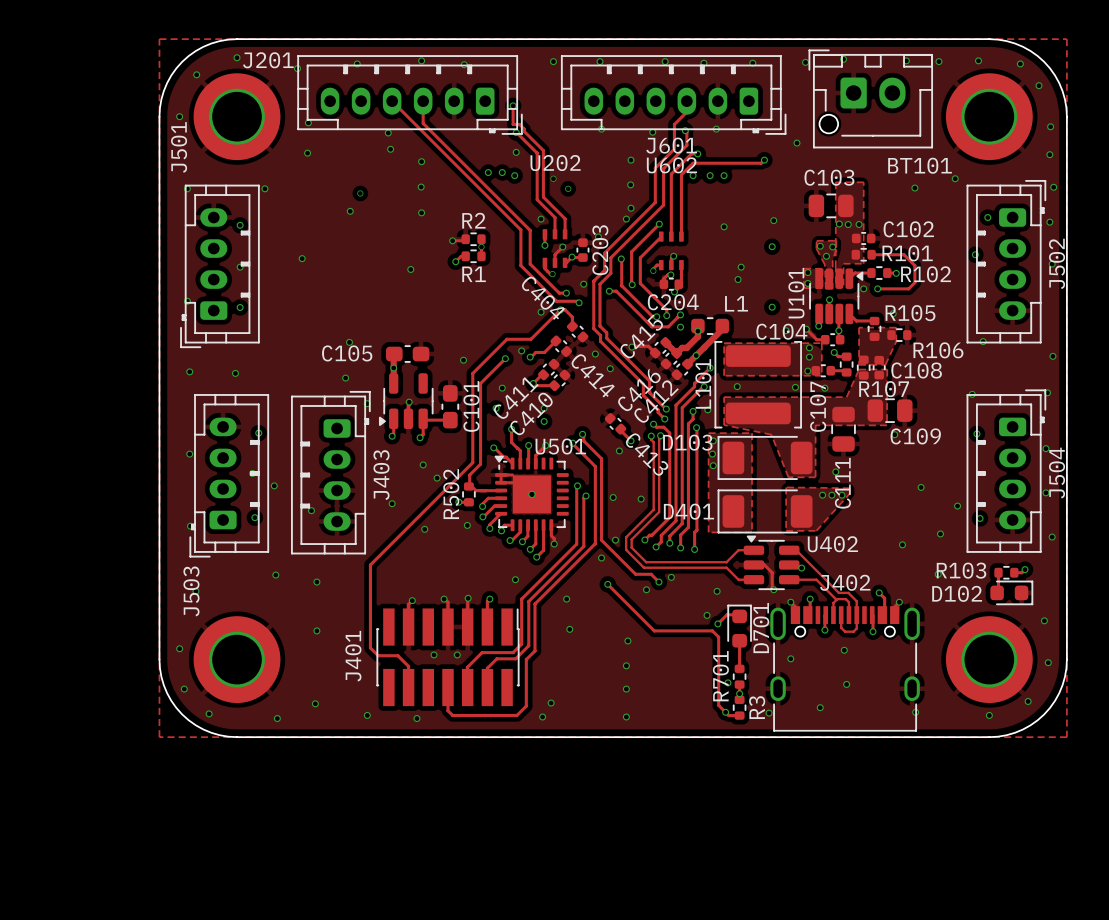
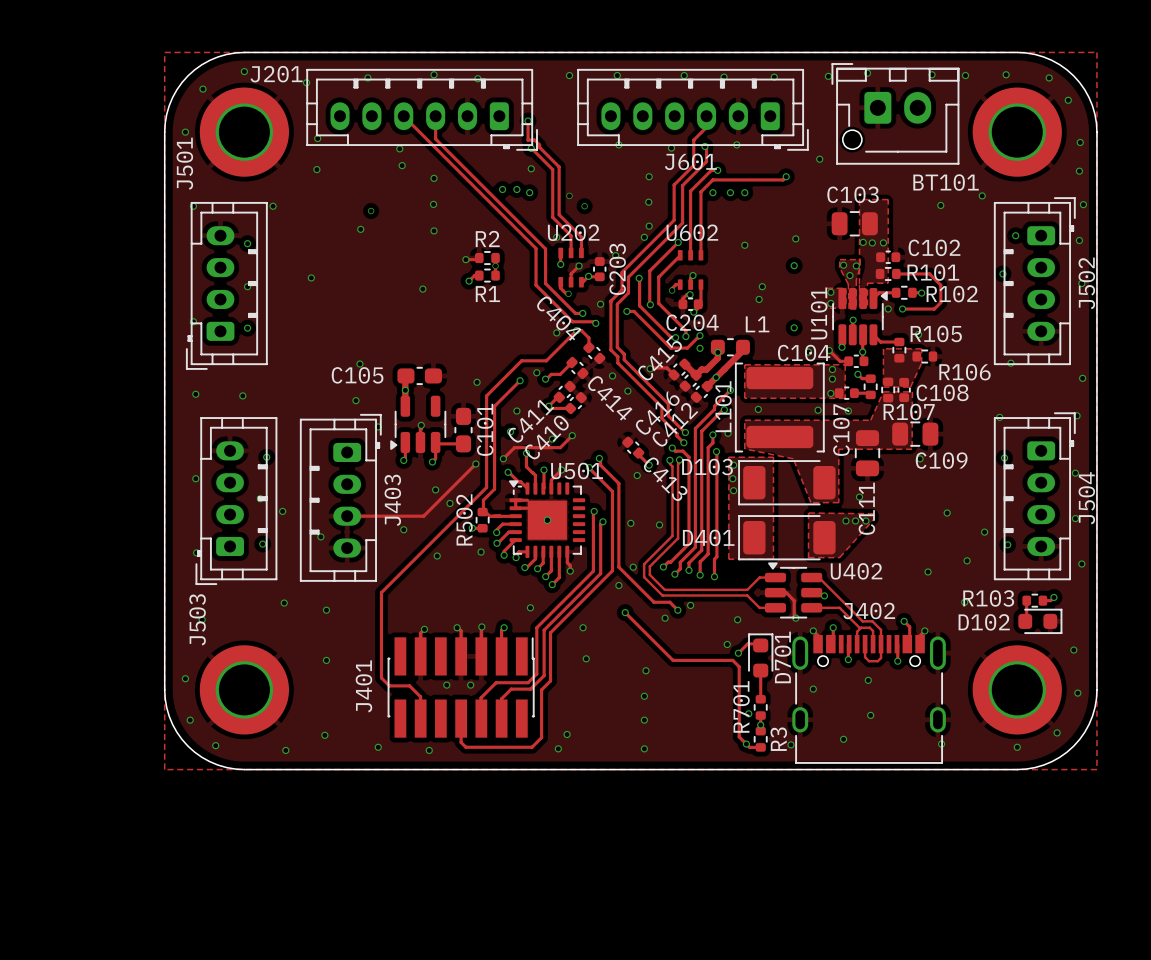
U202 name position: U202 (555, 163) -> U202 (573, 232)
U602 name position: U602 (671, 165) -> U602 (692, 232)
via: (544, 408) -> none
track: none -> (572, 435) (560, 447) (514, 447) (503, 458)
via: none -> (572, 435)
via: none -> (552, 439)
via: (544, 421) -> none
via: none -> (503, 458)
track: none -> (475, 464) (423, 516) (347, 516)
via: none -> (475, 464)

